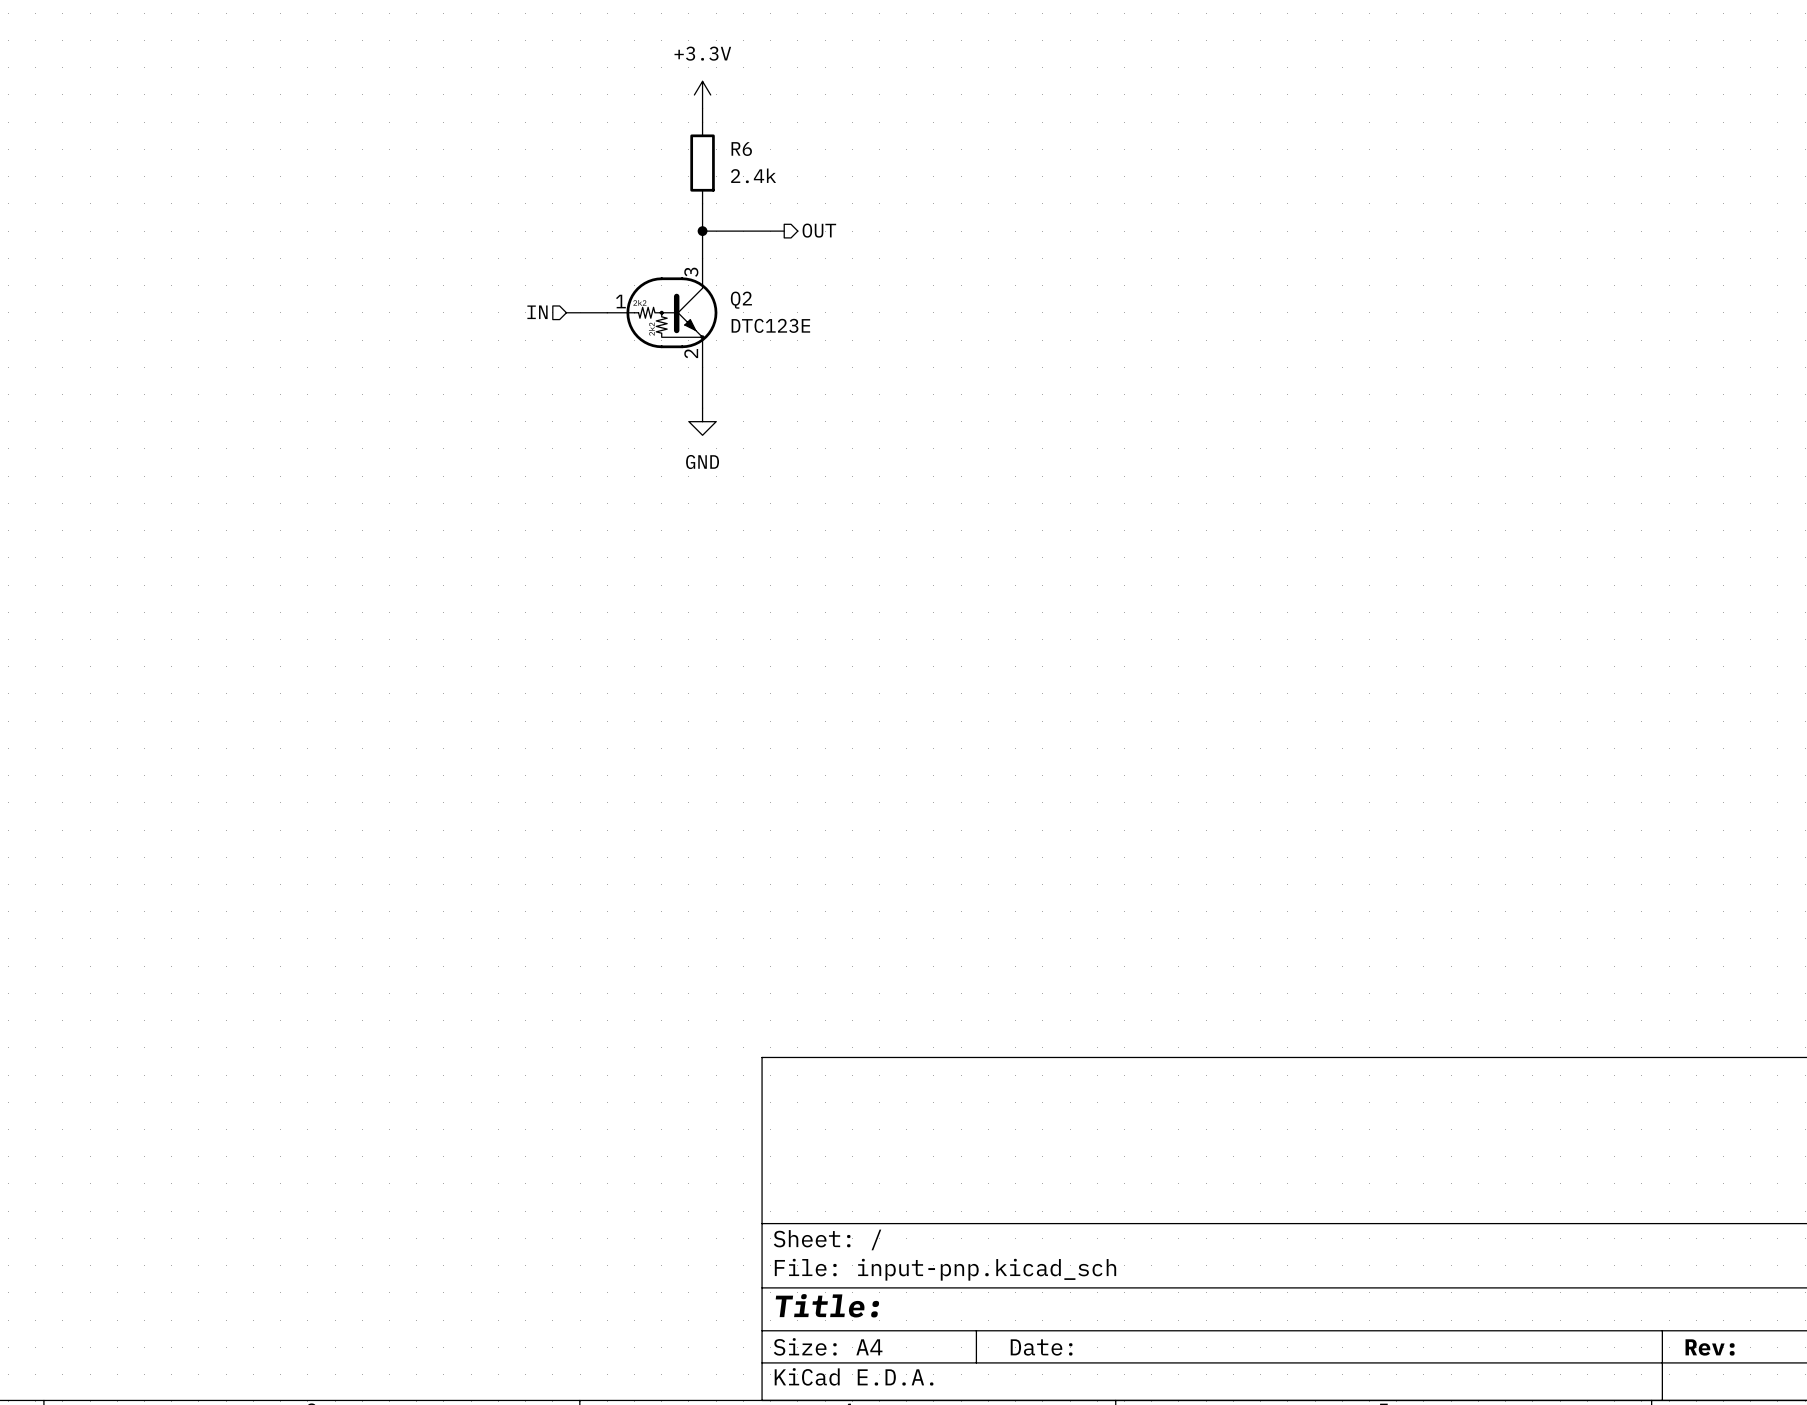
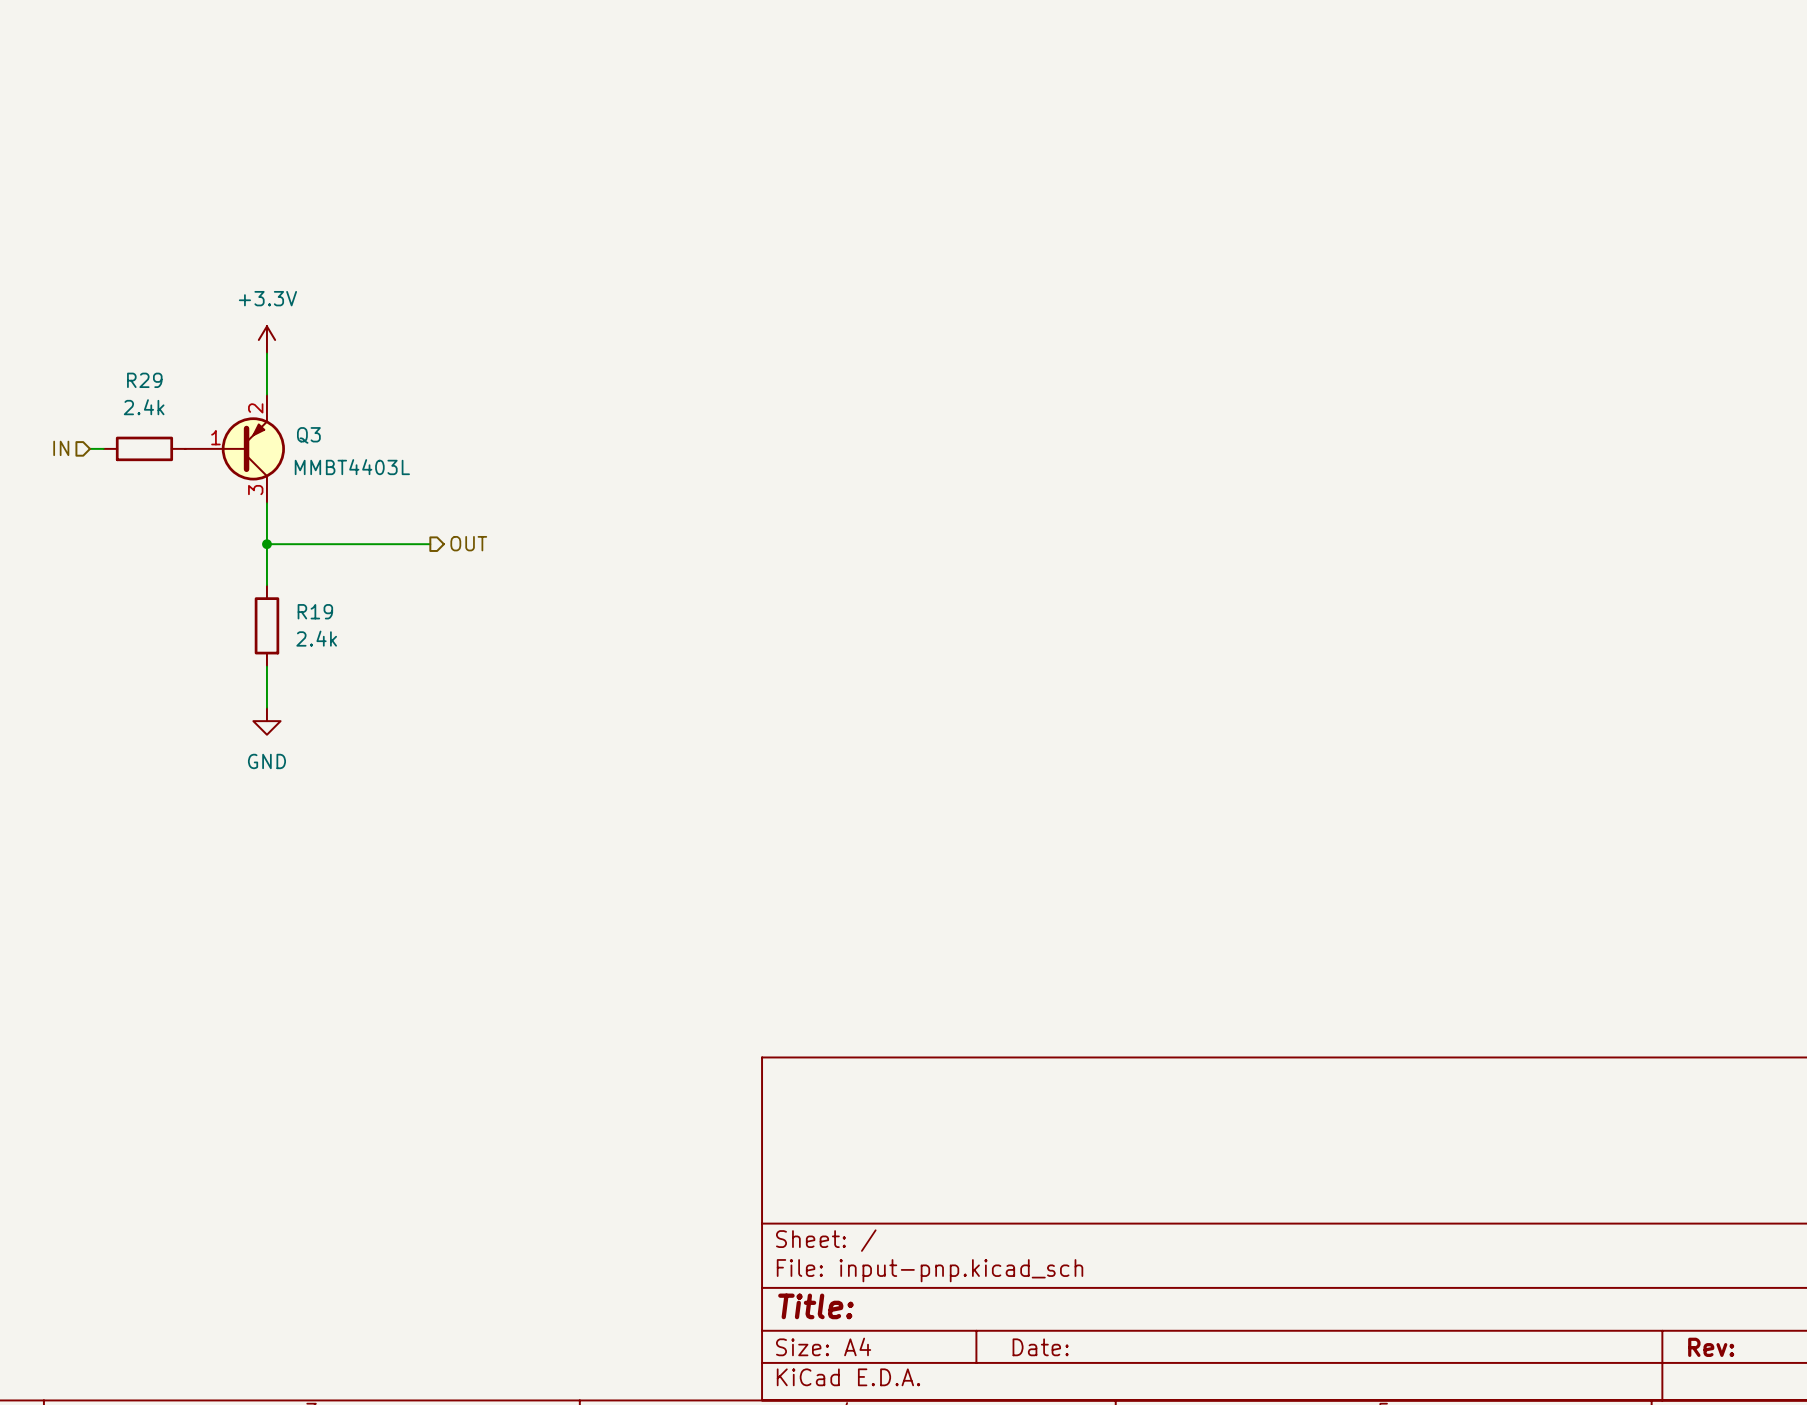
power symbol: +3.3V (702, 94) -> none
wire: (702, 108) (702, 122) -> none
R6: 2.4k (702, 163) -> none
wire: (702, 203) (702, 258) -> none
hierarchical label: OUT (819, 230) -> none
wire: (702, 231) (784, 231) -> none
junction: (702, 231) -> none
hierarchical label: IN (537, 312) -> none
wire: (566, 312) (607, 312) -> none
Q2: DTC123E (662, 312) -> none
power symbol: none -> +3.3V (266, 340)
wire: none -> (266, 353) (266, 394)
wire: (702, 367) (702, 408) -> none
power symbol: GND (702, 421) -> none
hierarchical label: none -> IN (61, 448)
wire: none -> (90, 448) (103, 448)
R29: none -> 2.4k (144, 448)
Q3: none -> (235, 448)
wire: none -> (266, 503) (266, 585)
hierarchical label: none -> OUT (468, 543)
wire: none -> (266, 544) (430, 544)
junction: none -> (266, 544)
R19: none -> 2.4k (266, 625)
wire: none -> (266, 666) (266, 707)
power symbol: none -> GND (266, 721)

